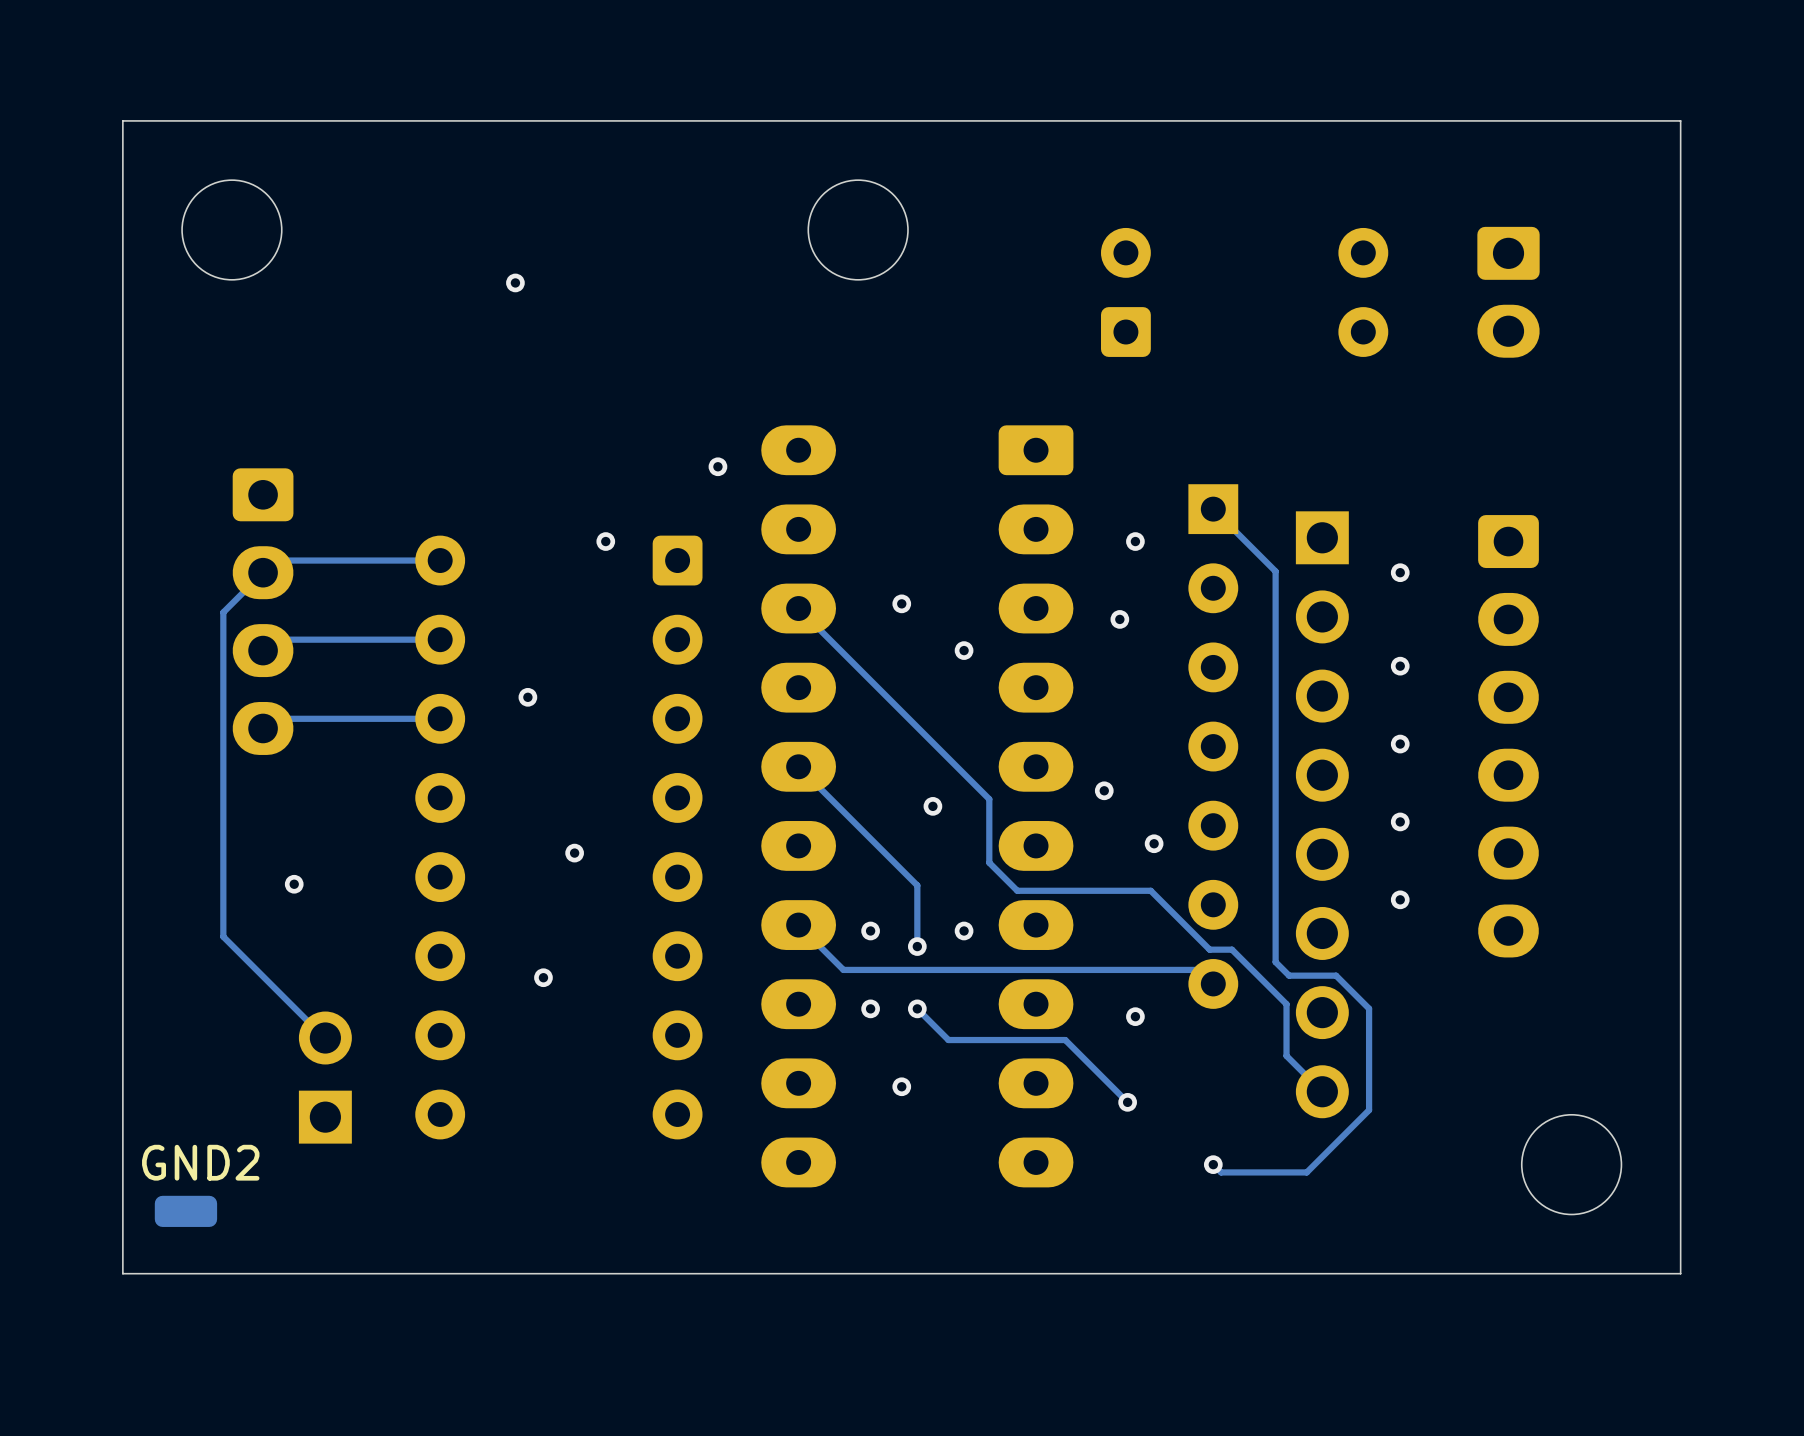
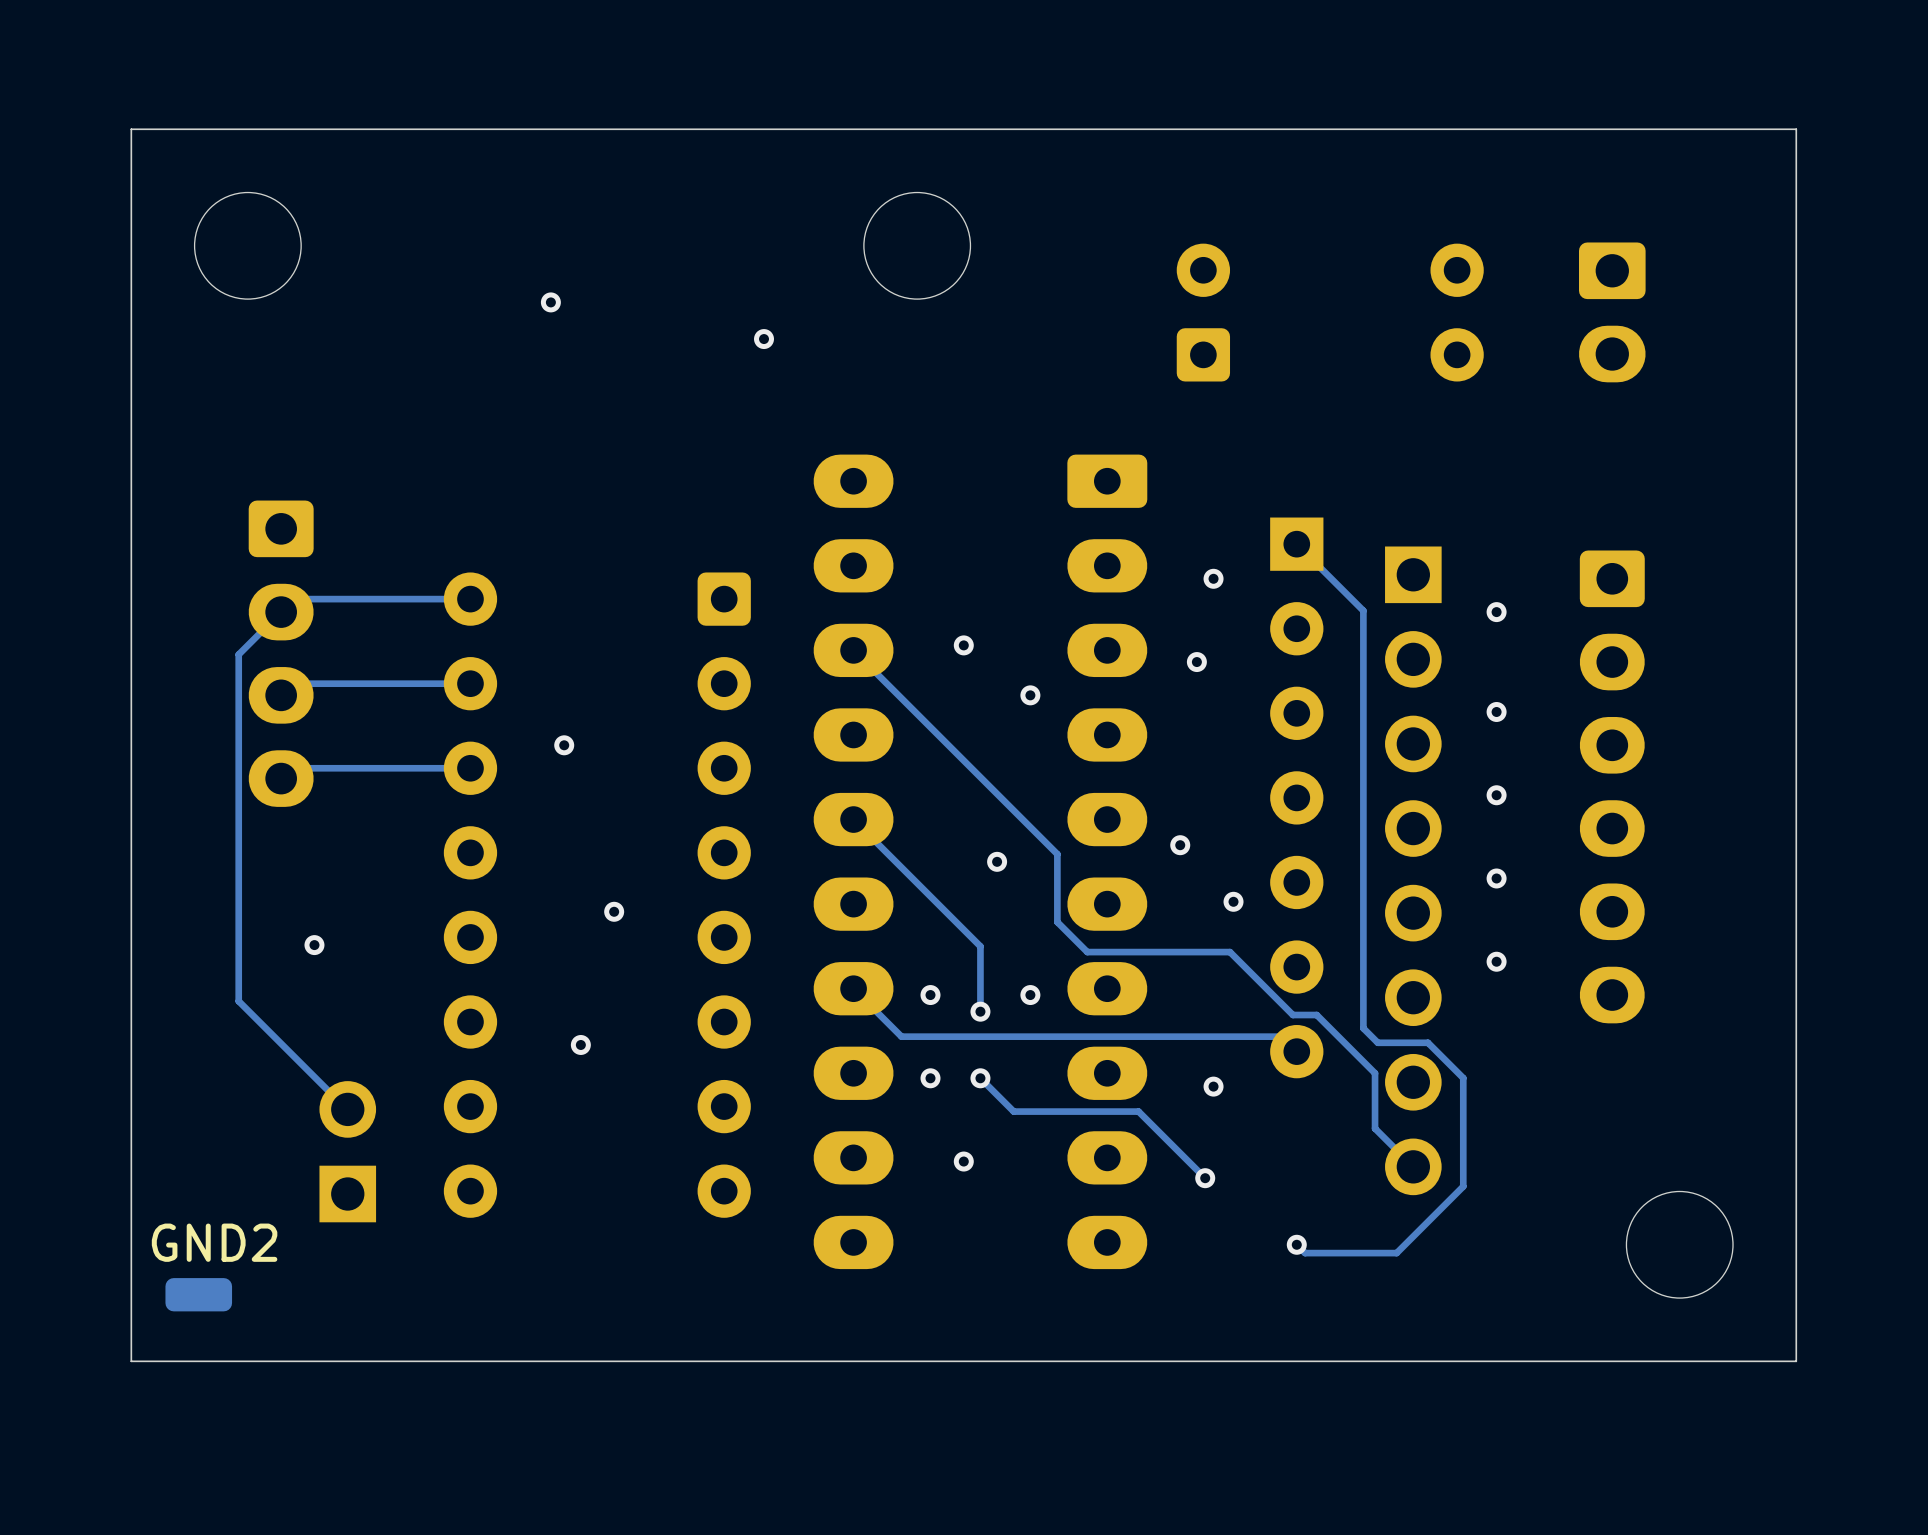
via: none -> (764, 339)
via: (717, 466) -> none
via: (605, 541) -> none

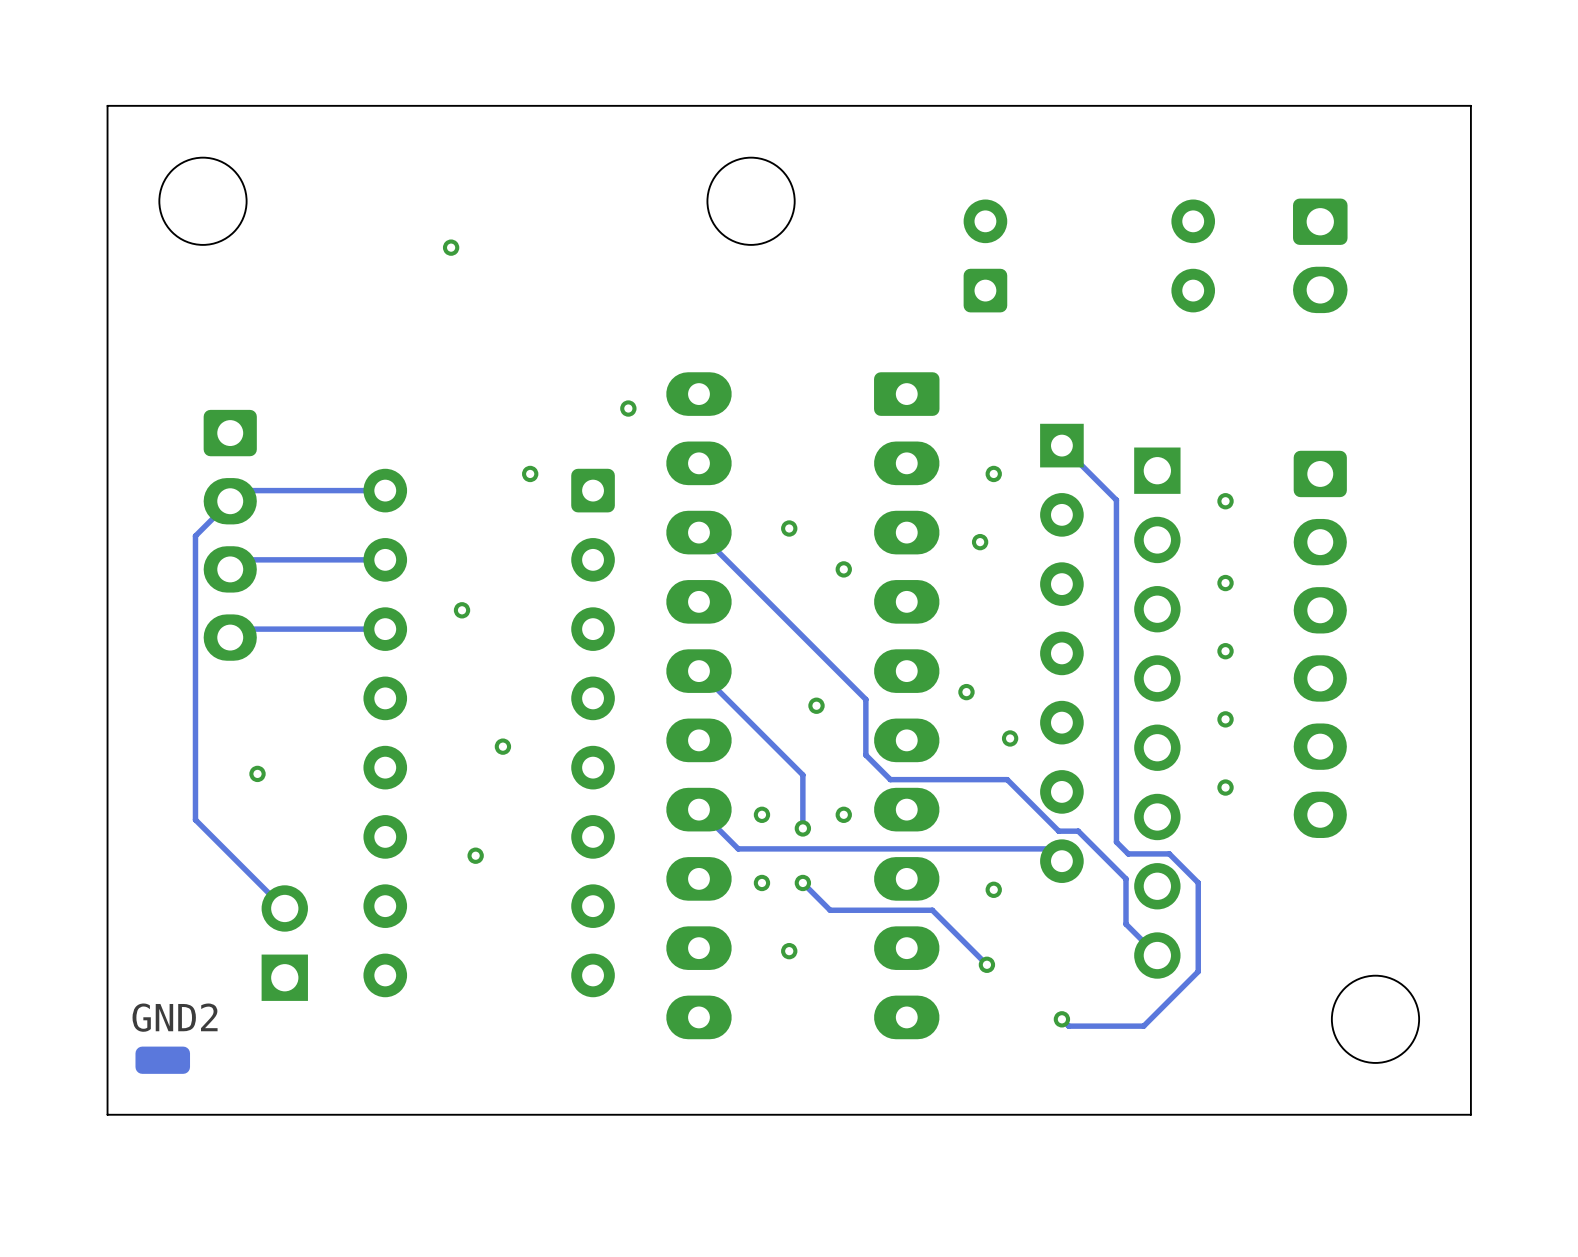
via: (764, 339) -> none
via: none -> (628, 408)
via: none -> (530, 473)

